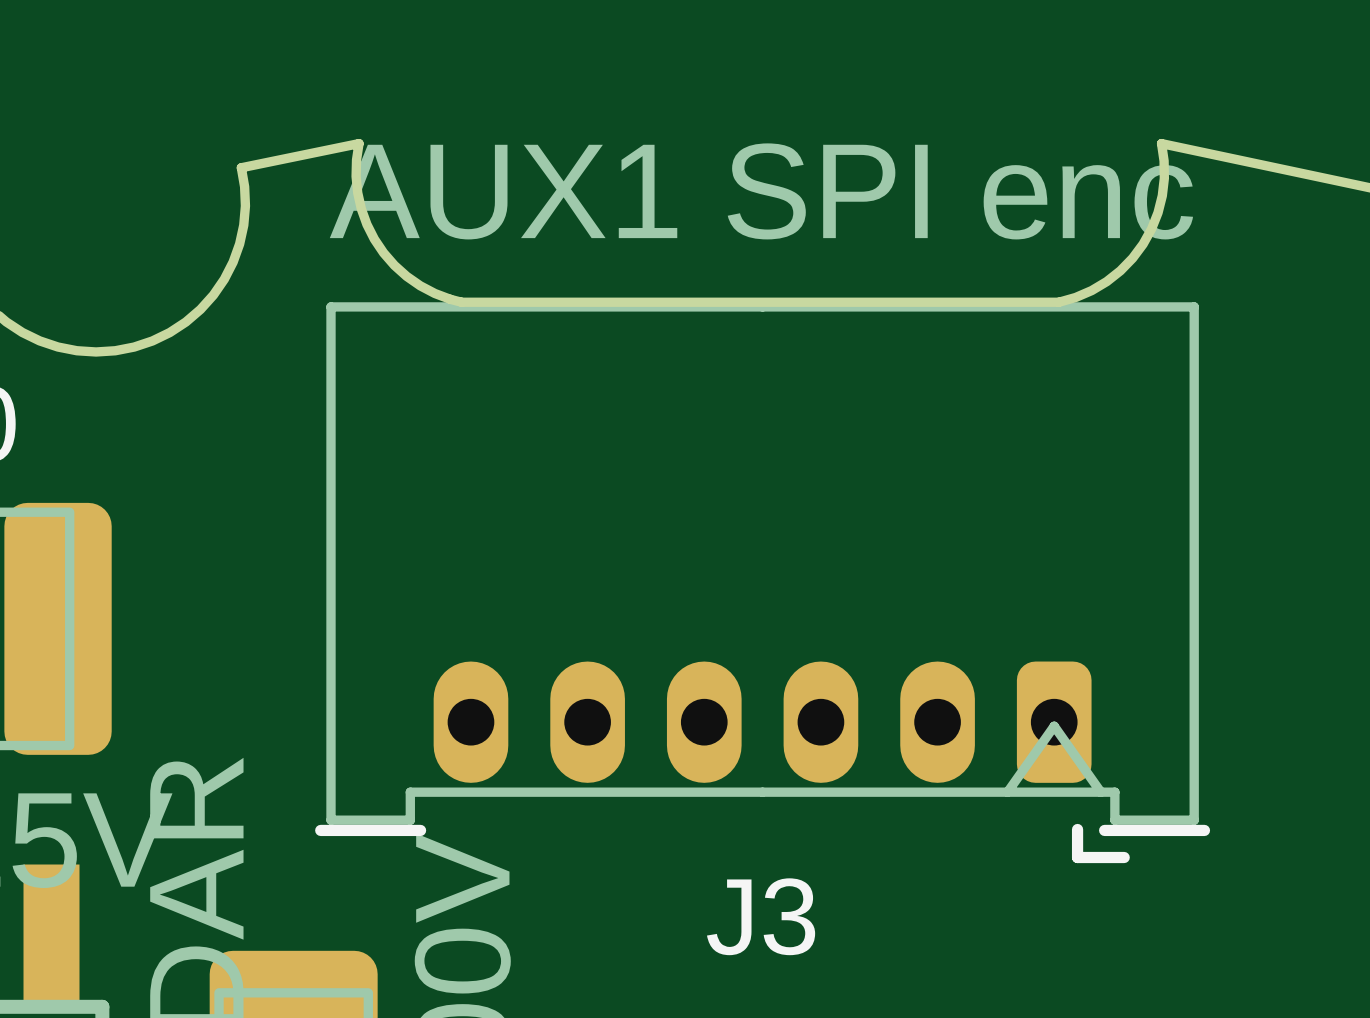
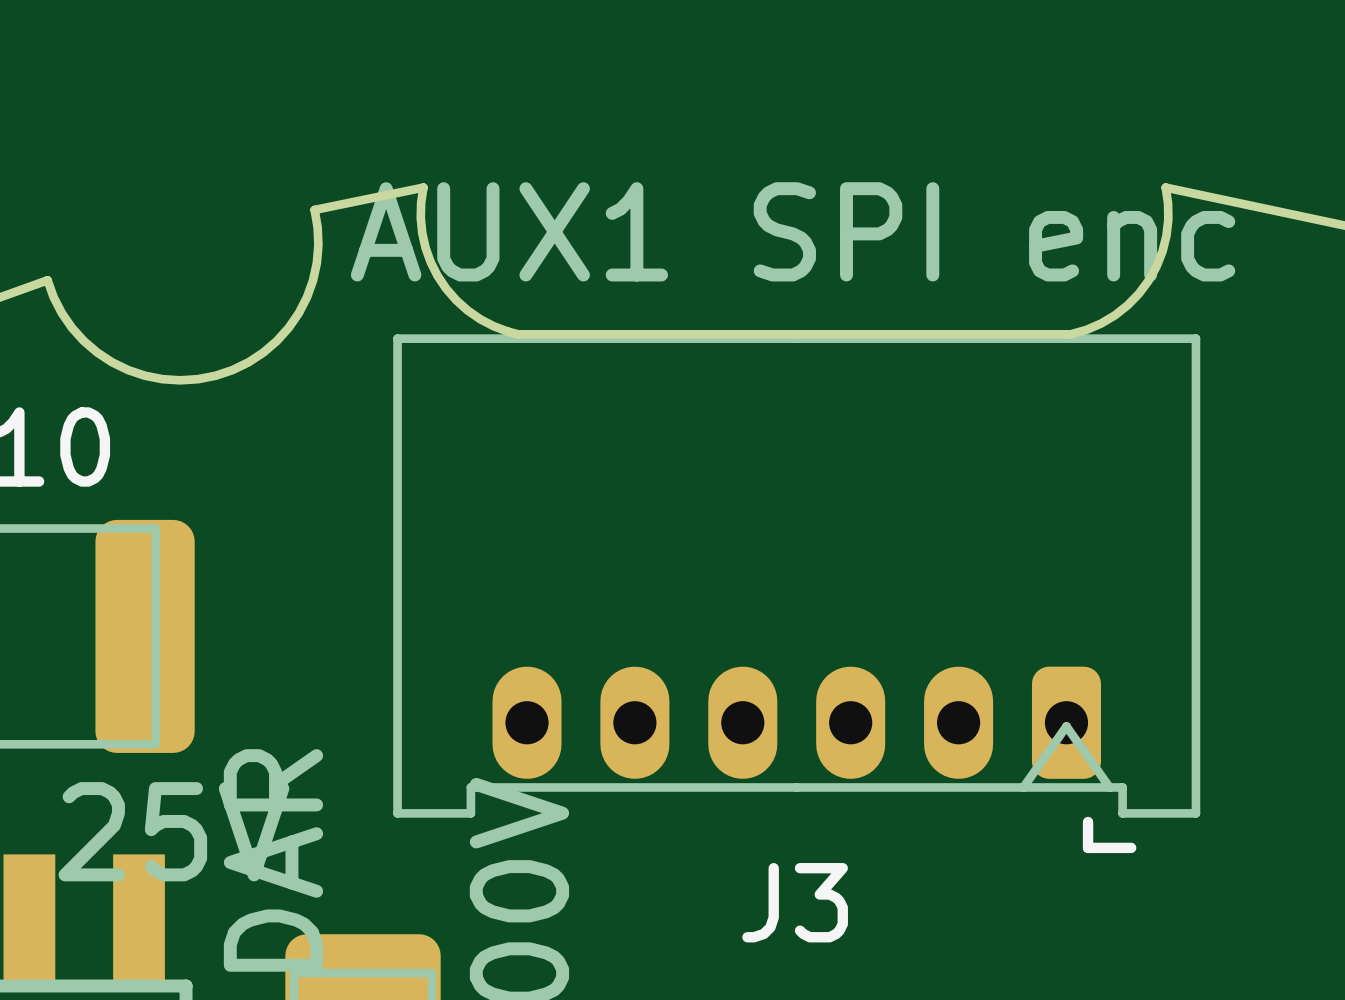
J3 footprint: [315, 302, 1211, 864] -> [393, 334, 1201, 854]

